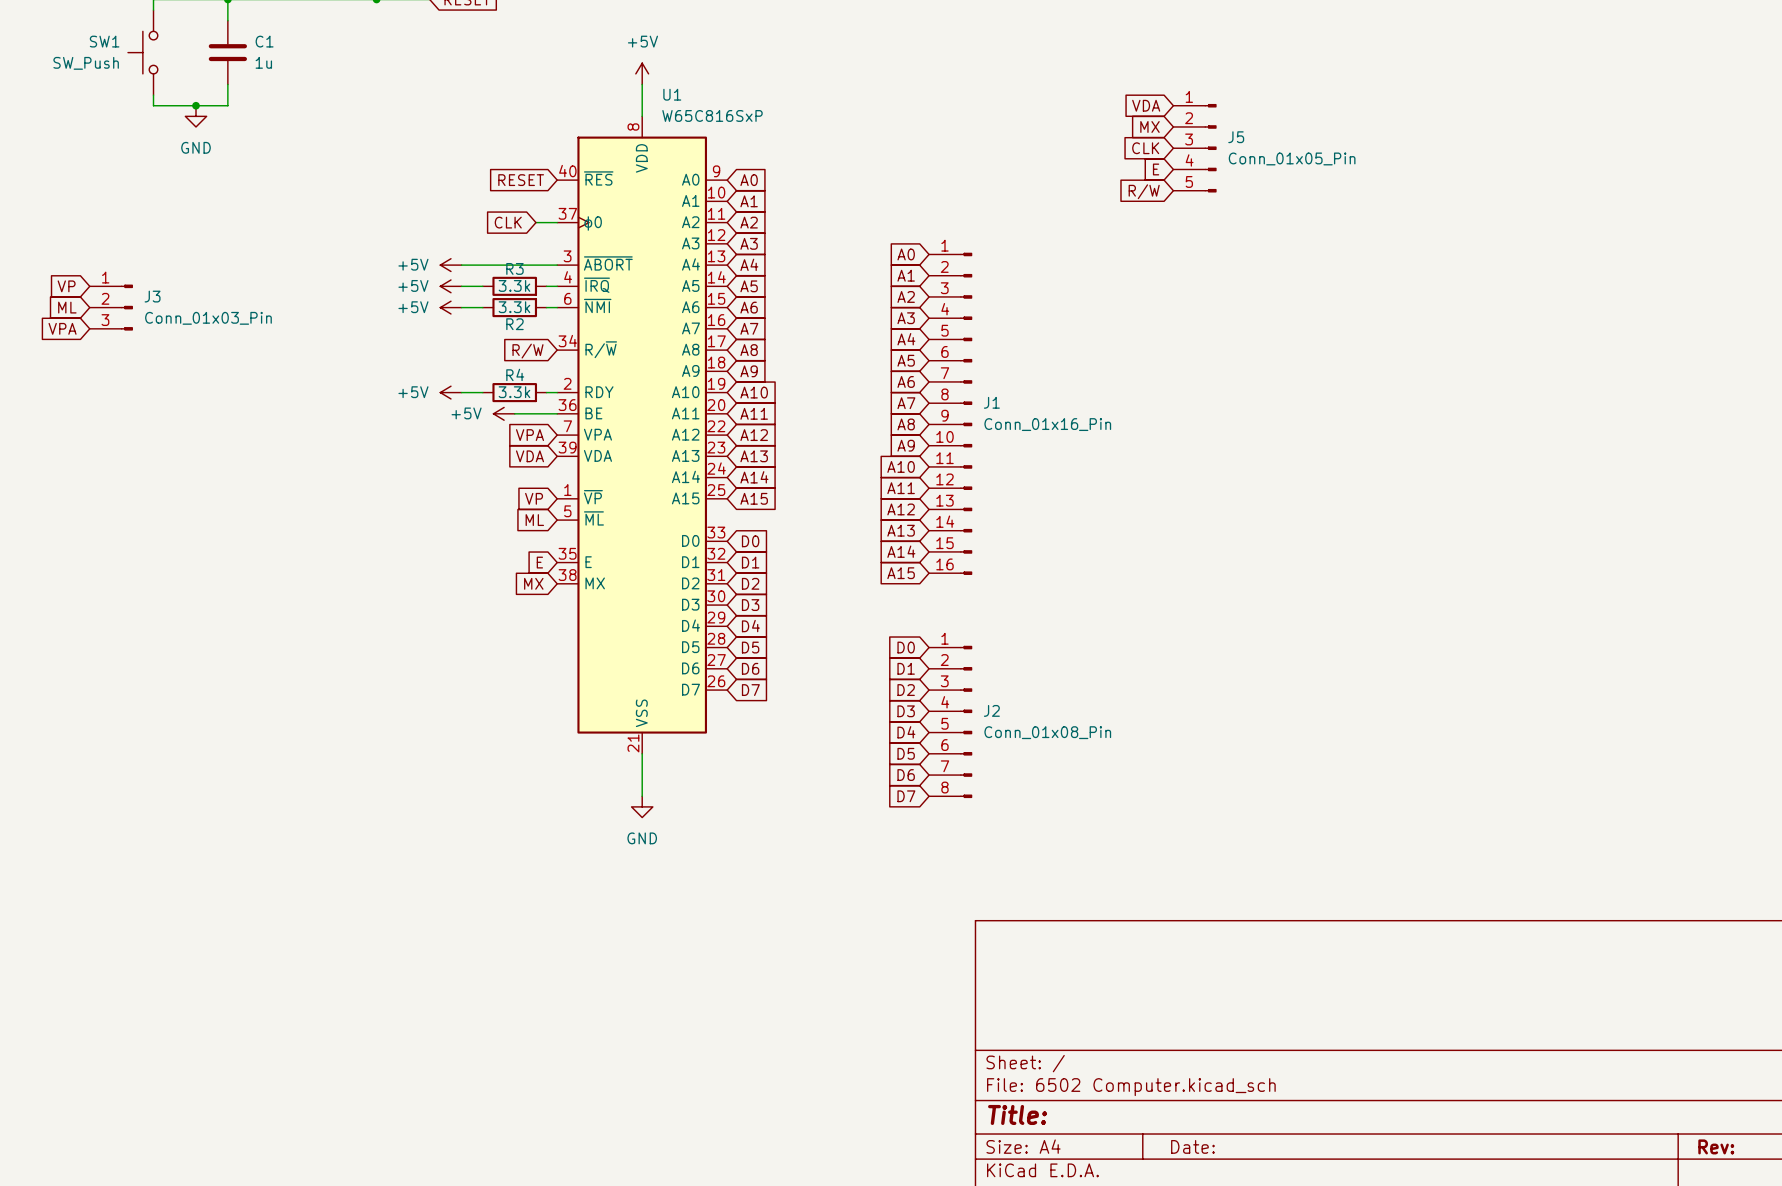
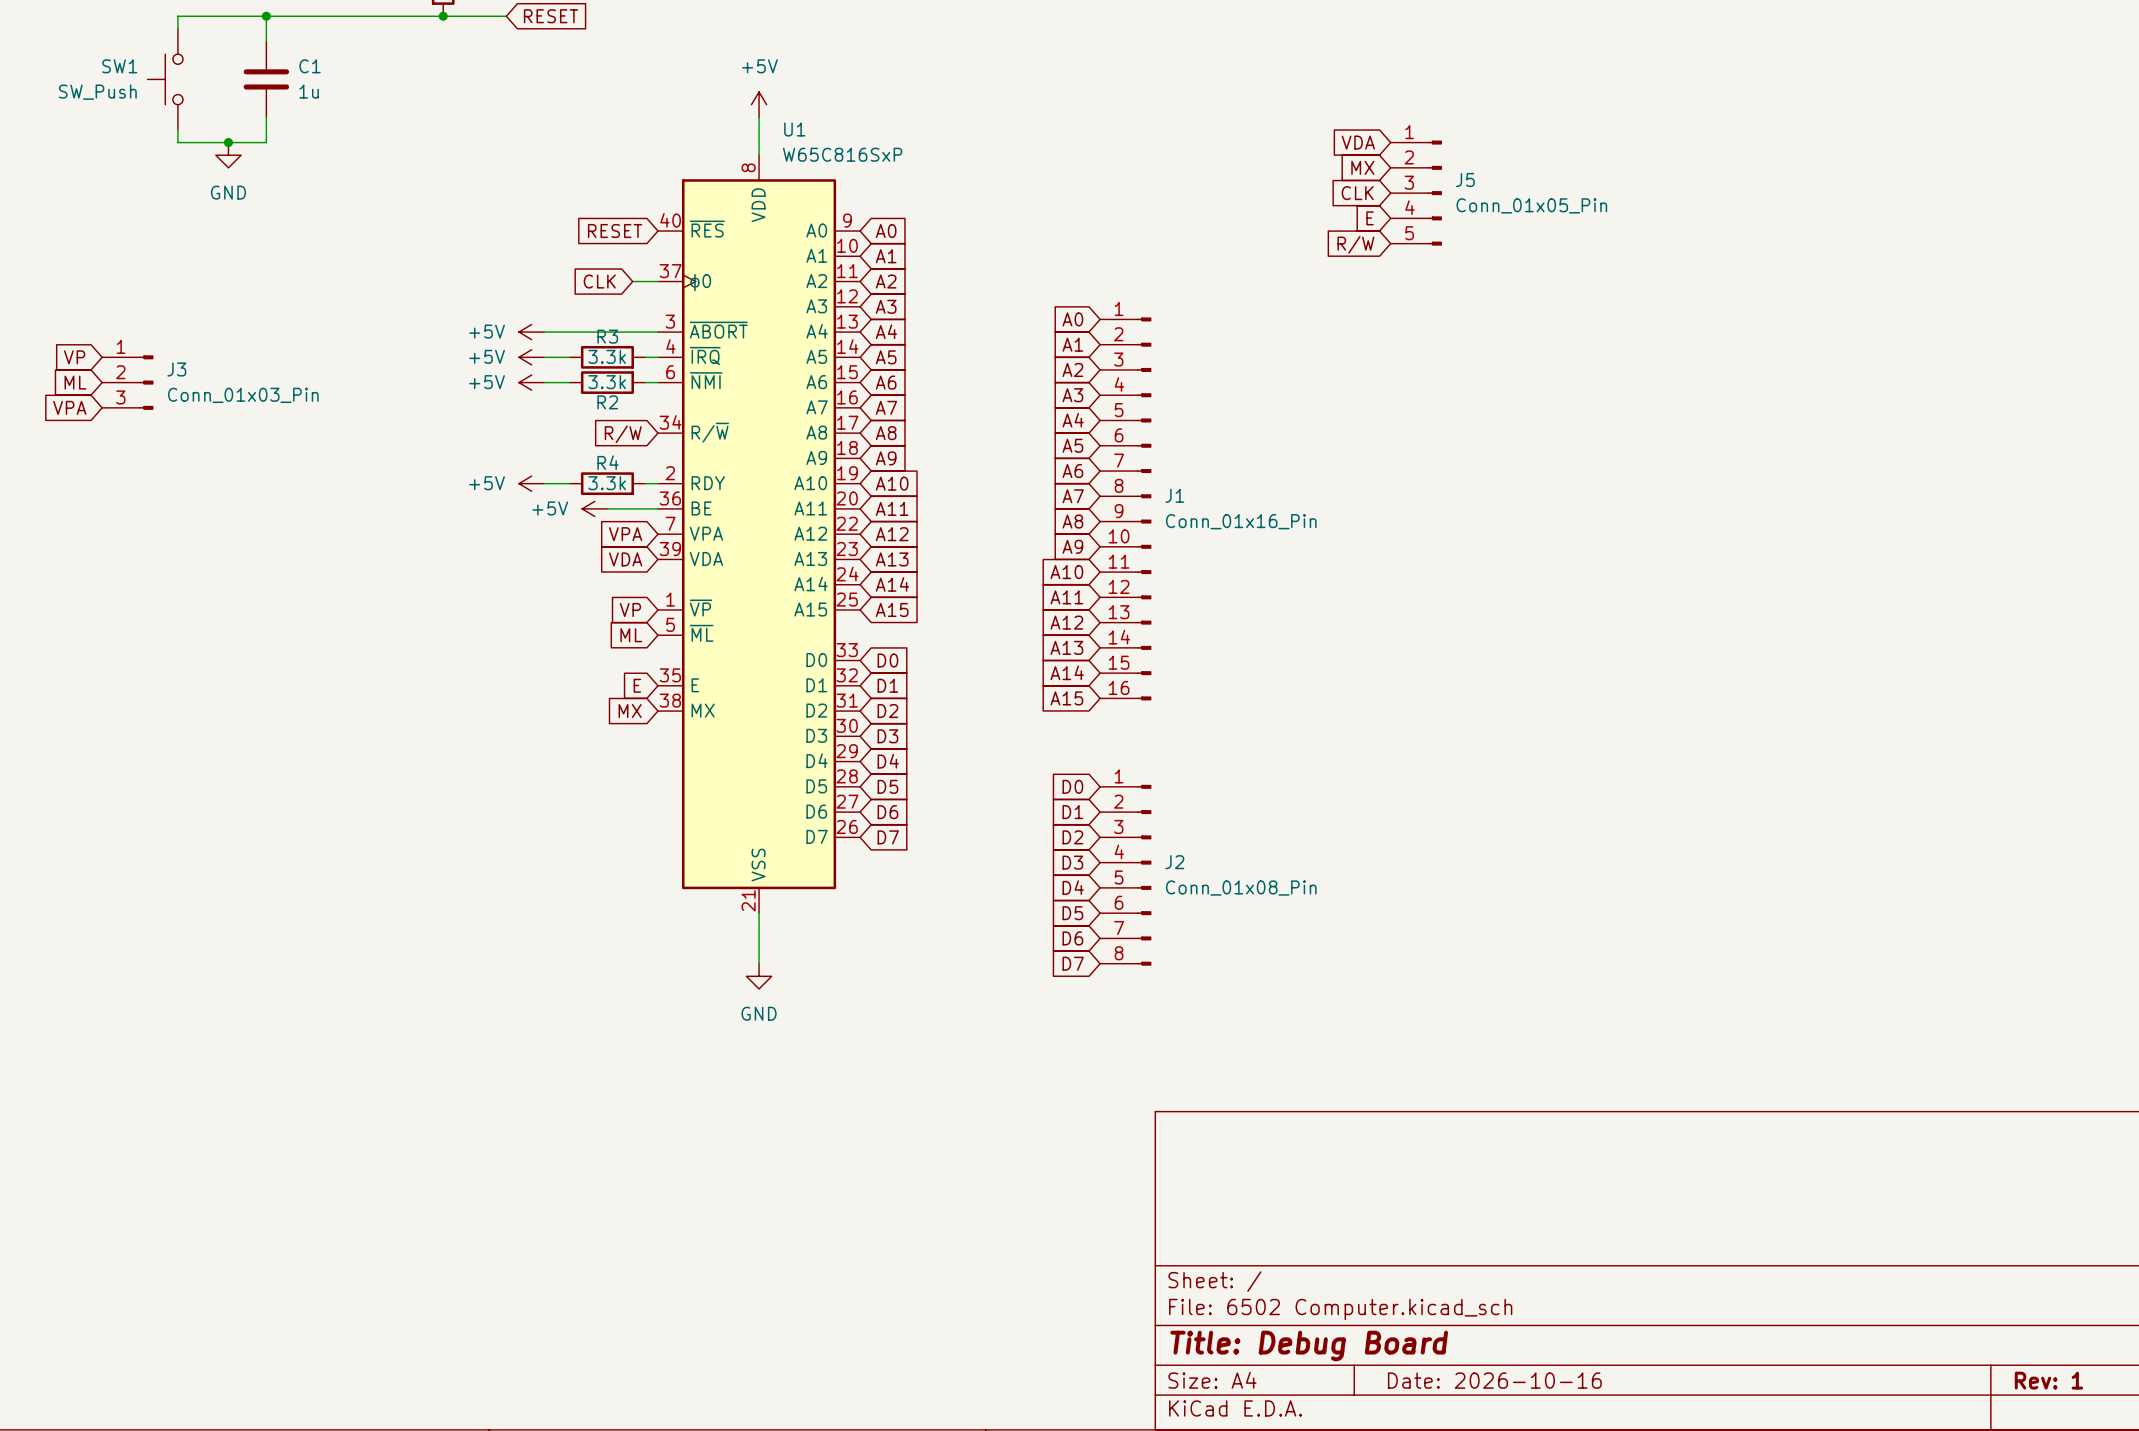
title block: Title: (1017, 1114) -> Title: Debug Board (1309, 1345)
title block: Date: (1192, 1146) -> Date: 2026-10-16 (1494, 1380)
title block: Rev: (1716, 1146) -> Rev: 1 (2048, 1380)

